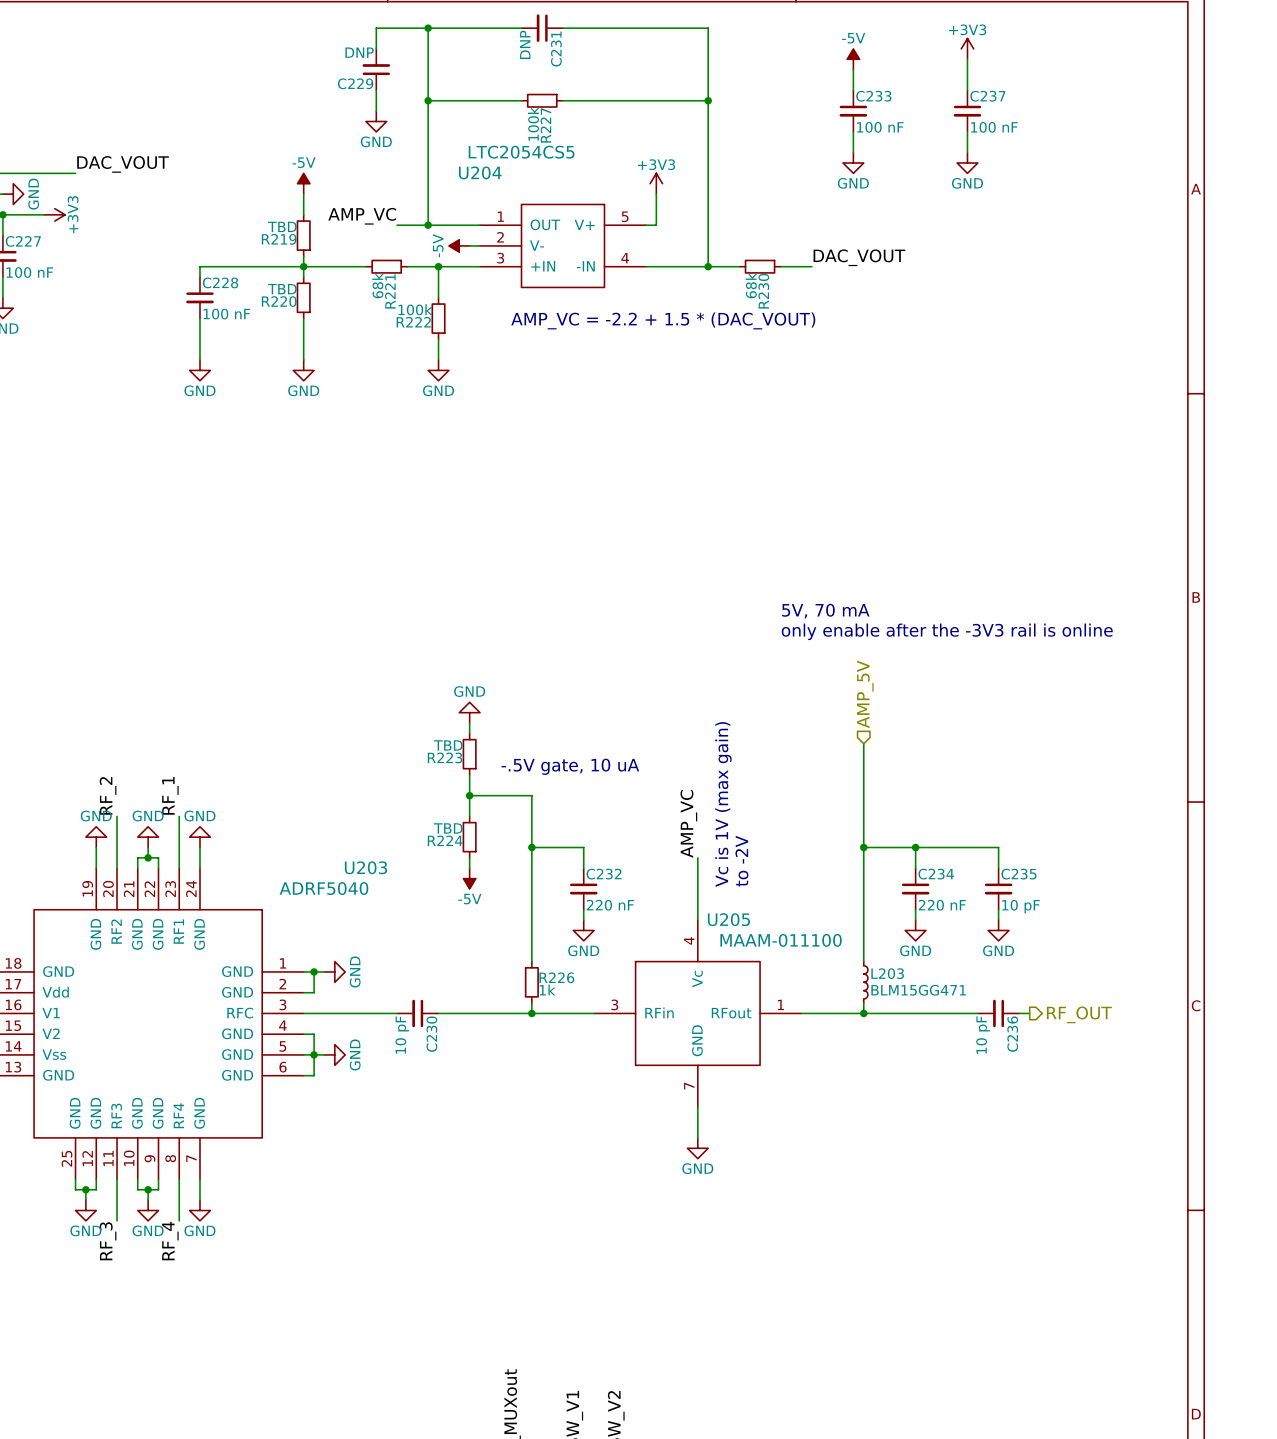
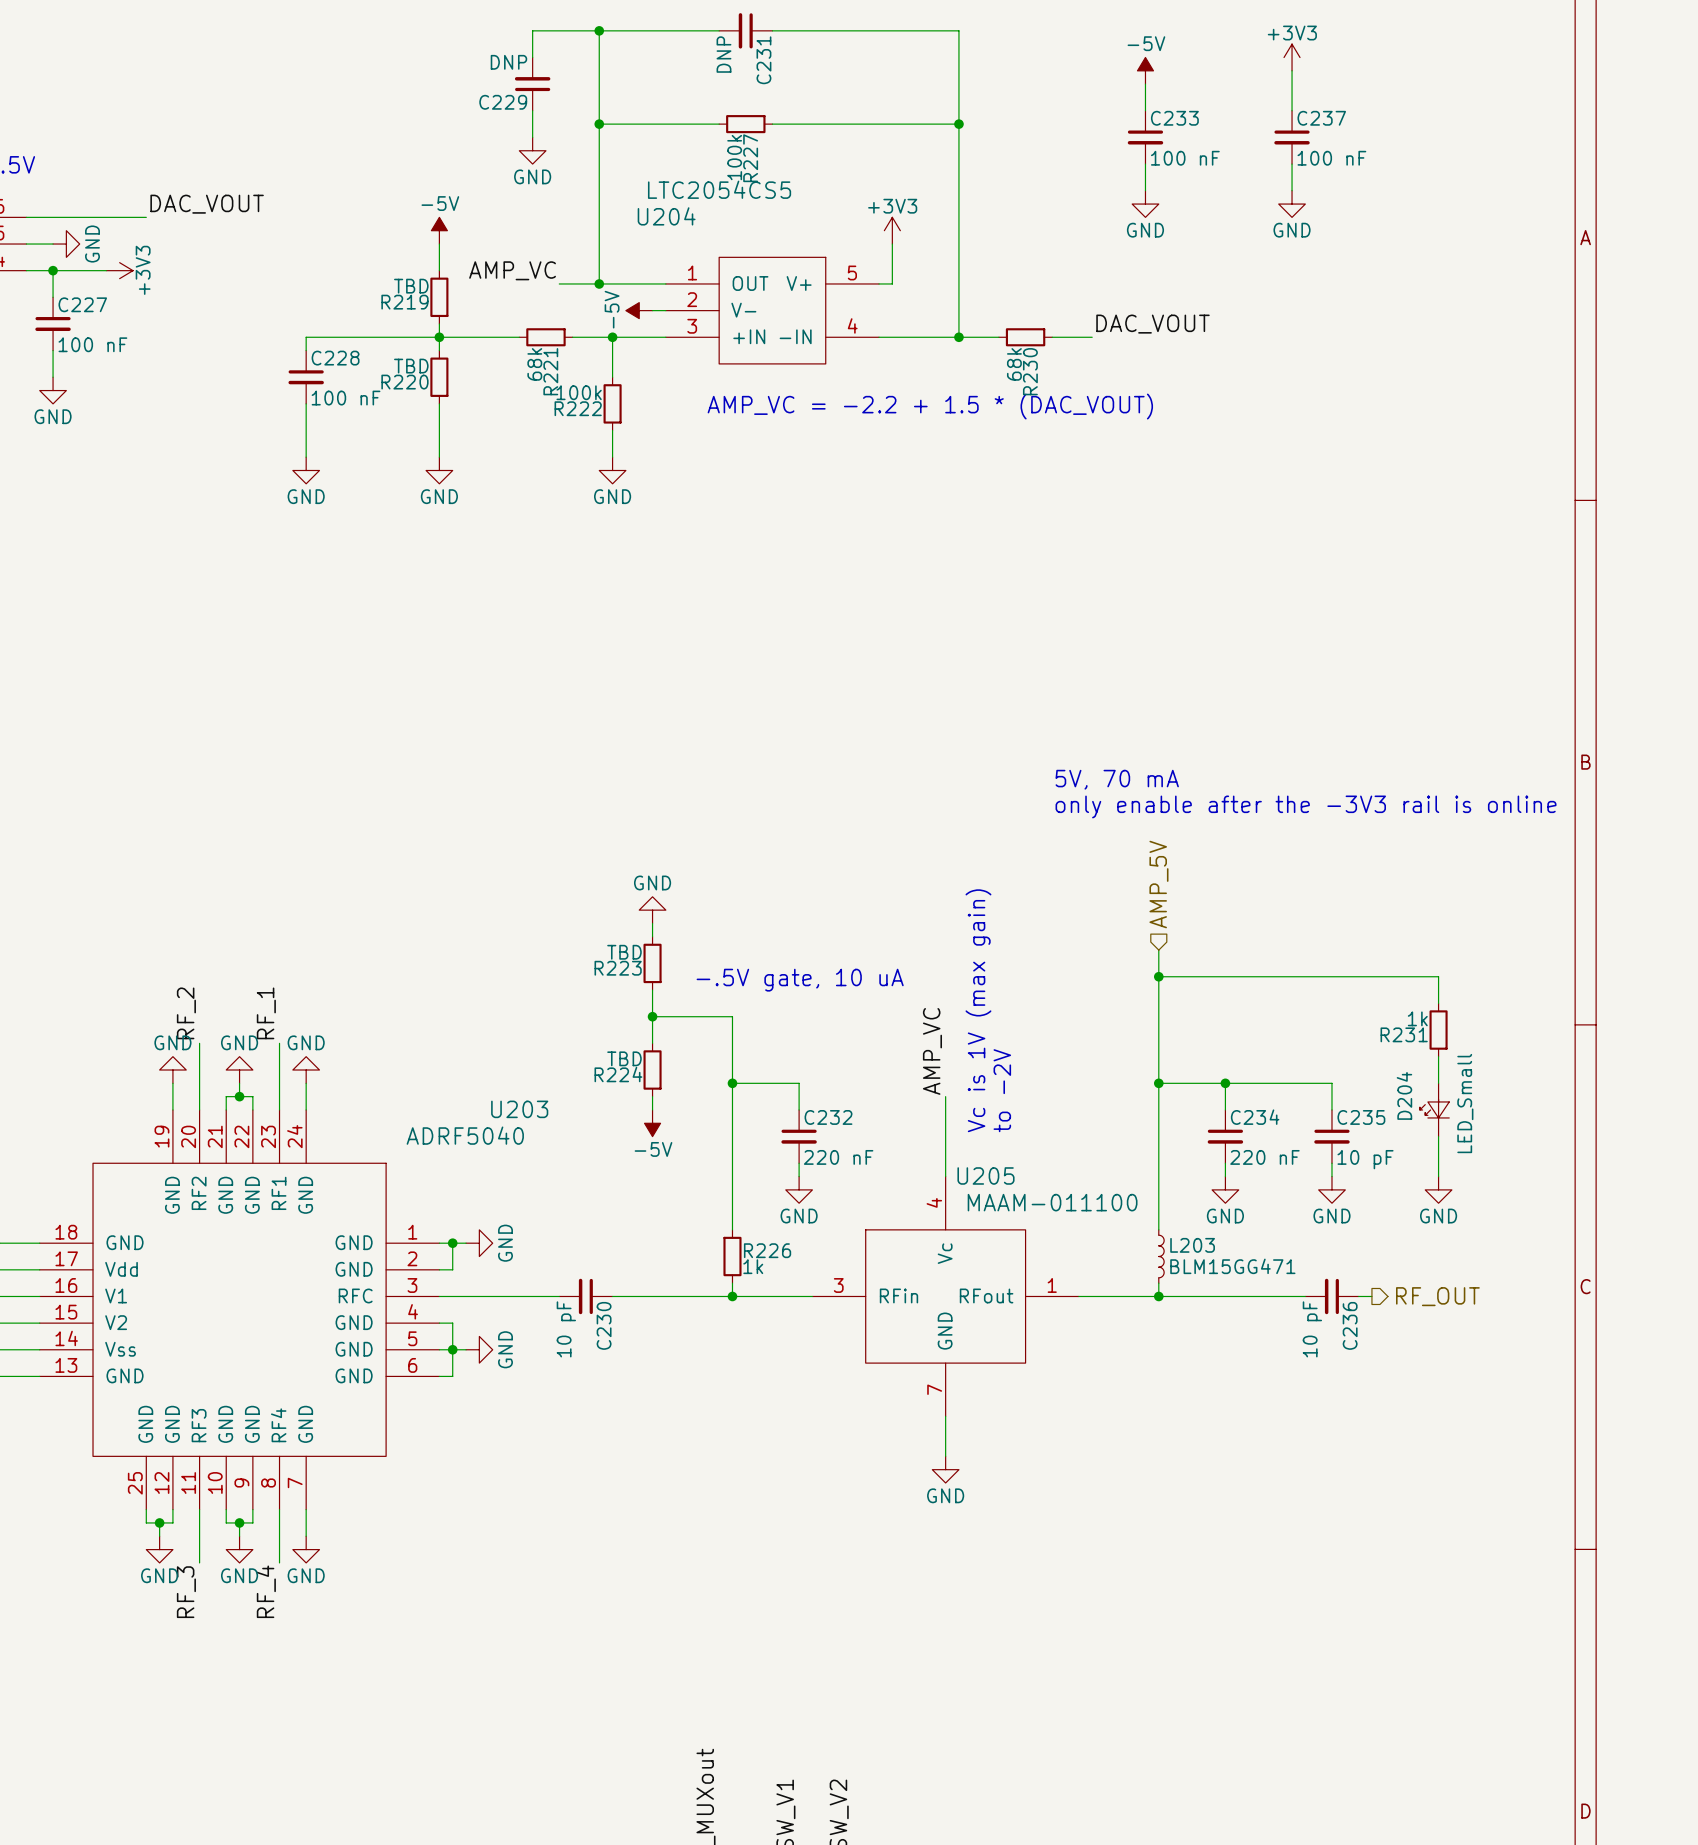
wire: none -> (1158, 976) (1438, 976) (1438, 1003)
junction: none -> (1158, 976)
R231: none -> 1k (1438, 1030)
wire: none -> (1438, 1056) (1438, 1083)
D204: none -> LED_Small (1434, 1109)
wire: none -> (1438, 1136) (1438, 1176)
power symbol: none -> GND (1438, 1189)

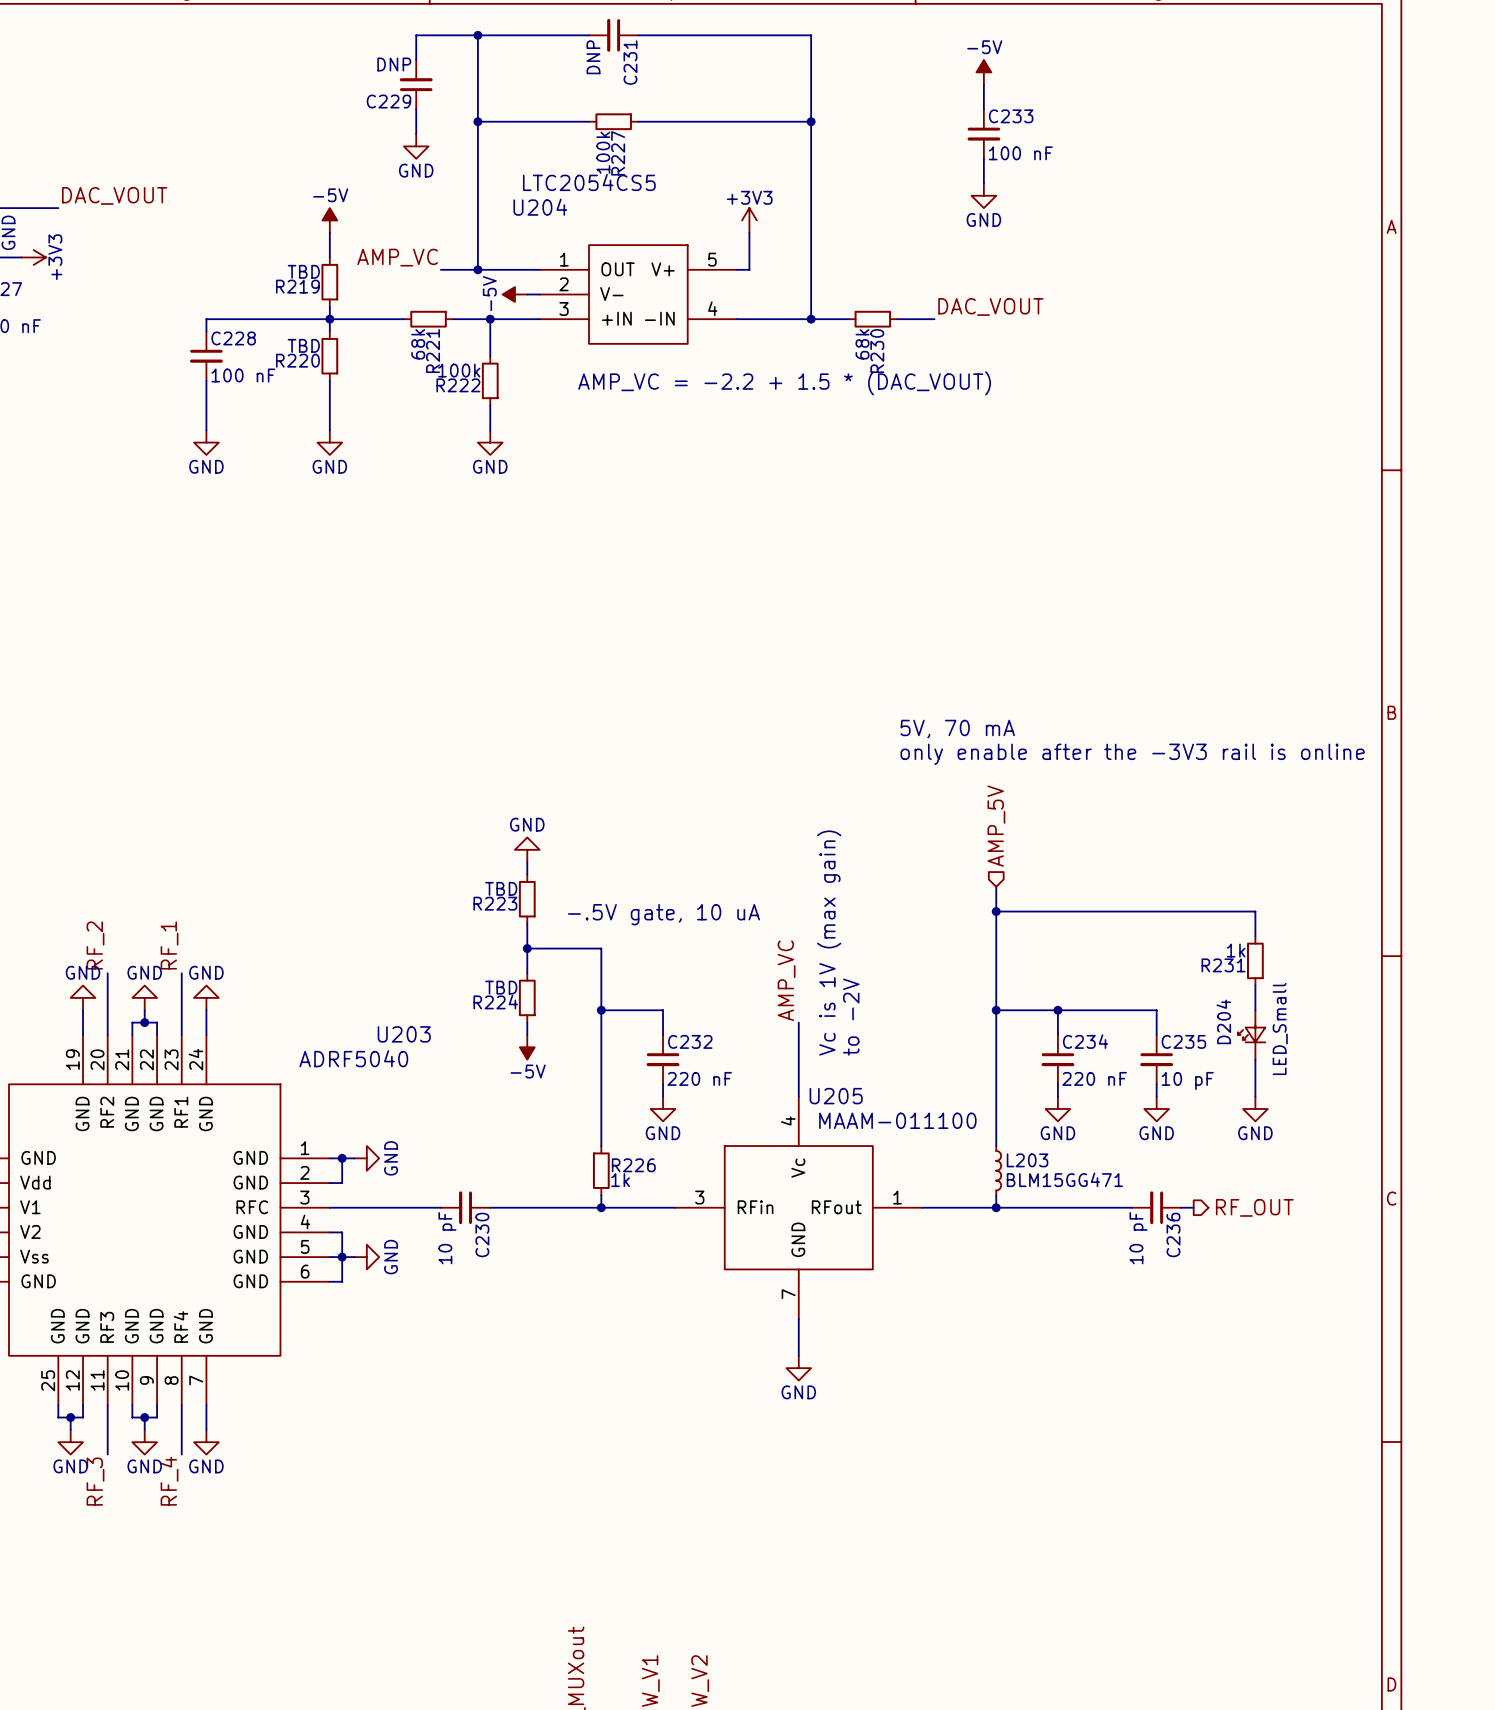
power symbol: +3V3 (1292, 57) -> none
wire: (1292, 70) (1292, 110) -> none
C237: 100 nF (1292, 137) -> none
wire: (1292, 164) (1292, 190) -> none
power symbol: GND (1292, 204) -> none

